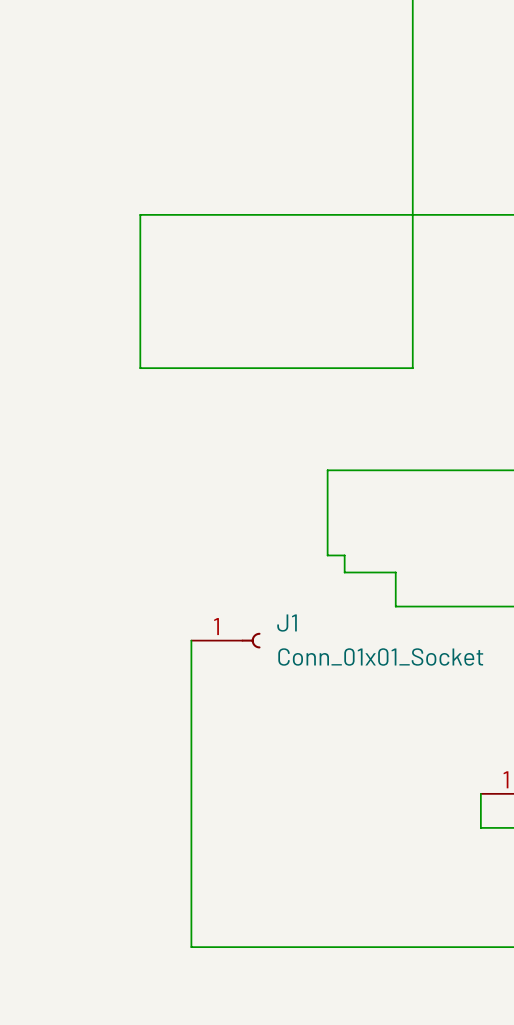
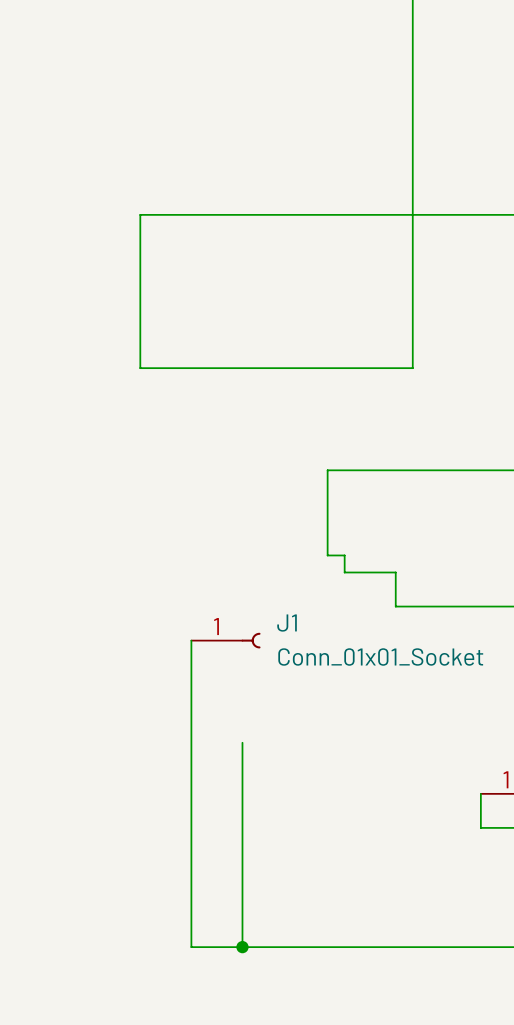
wire: none -> (242, 742) (242, 947)
junction: none -> (242, 947)

